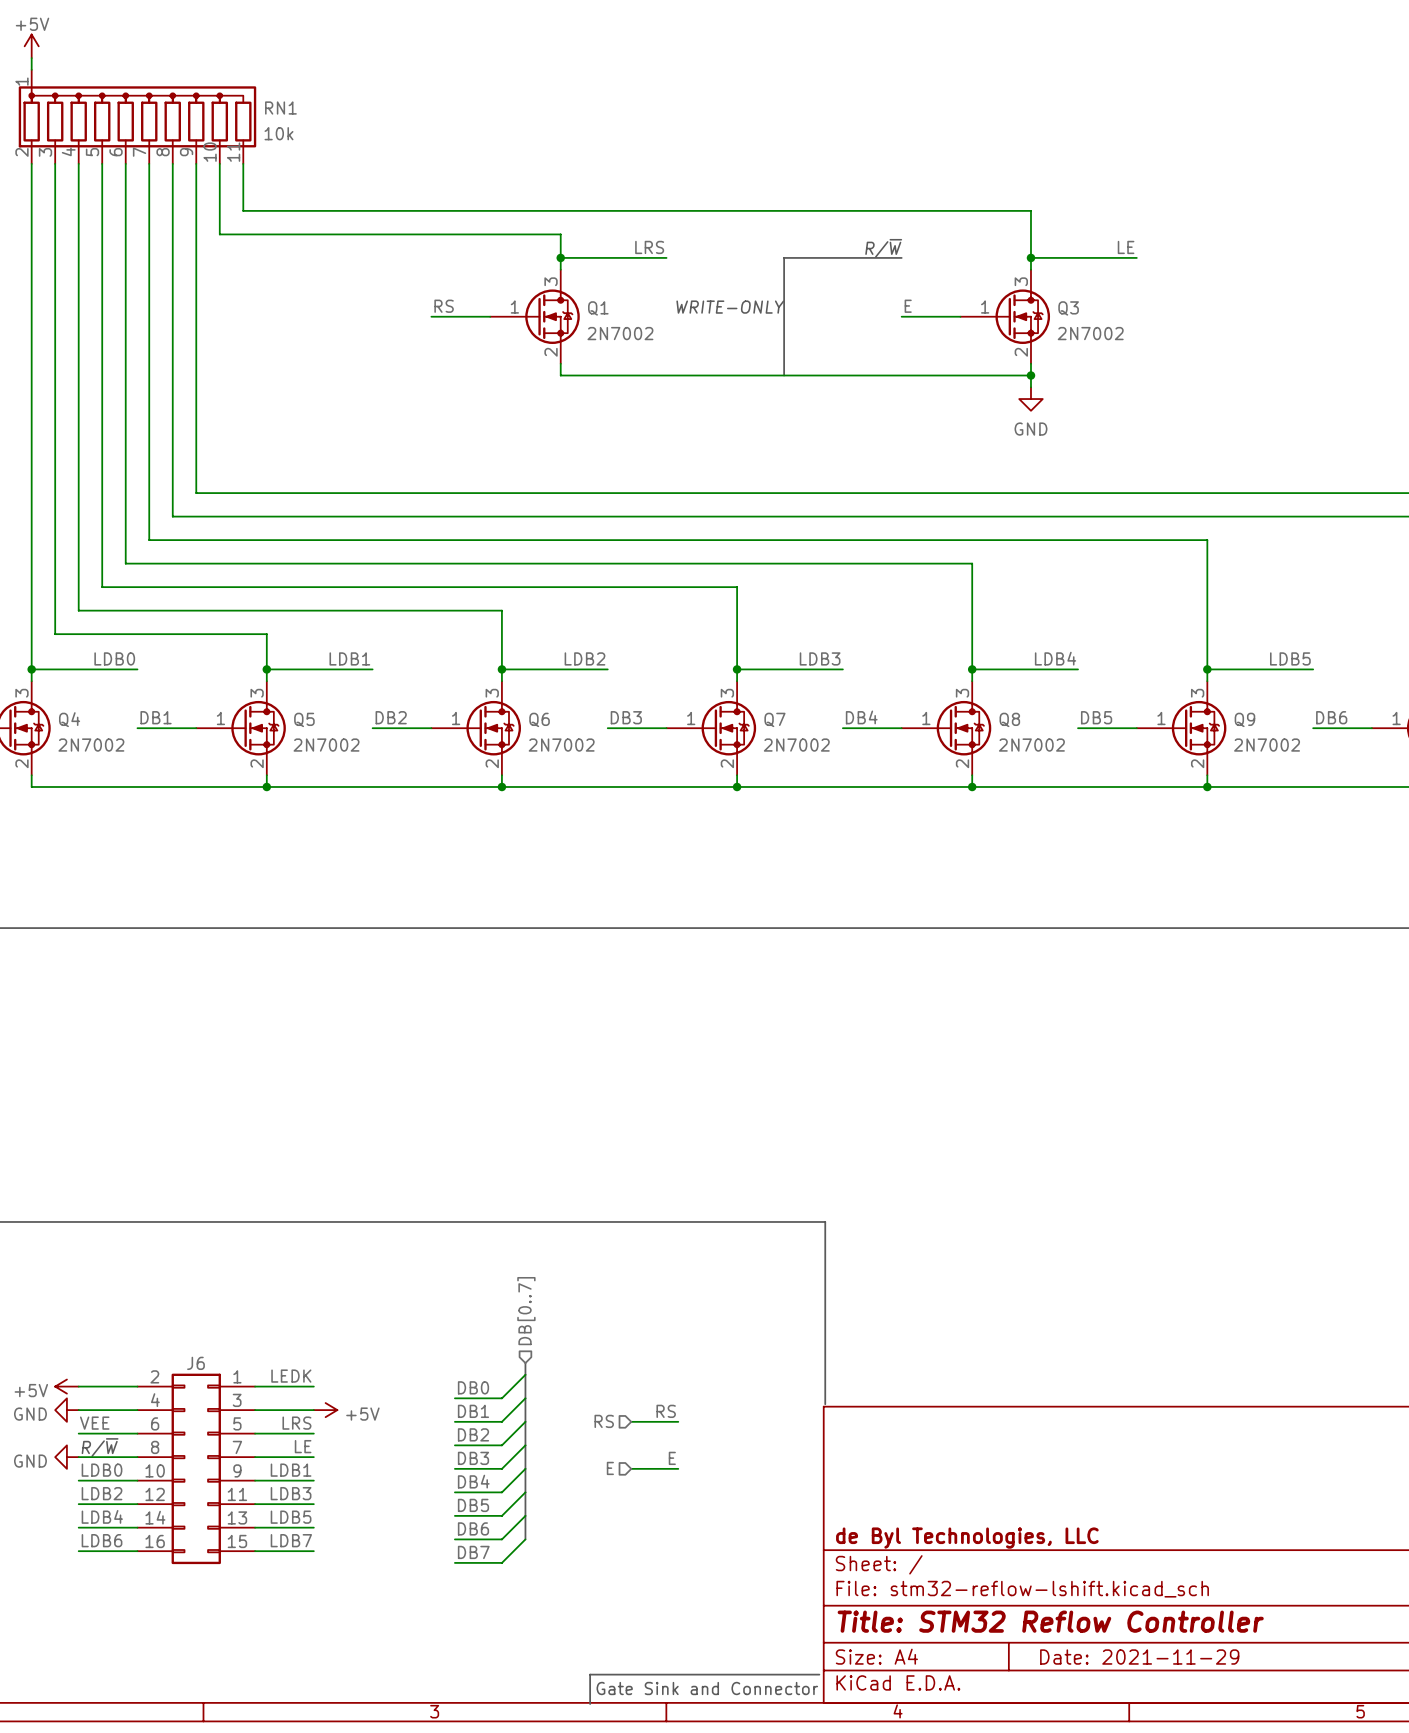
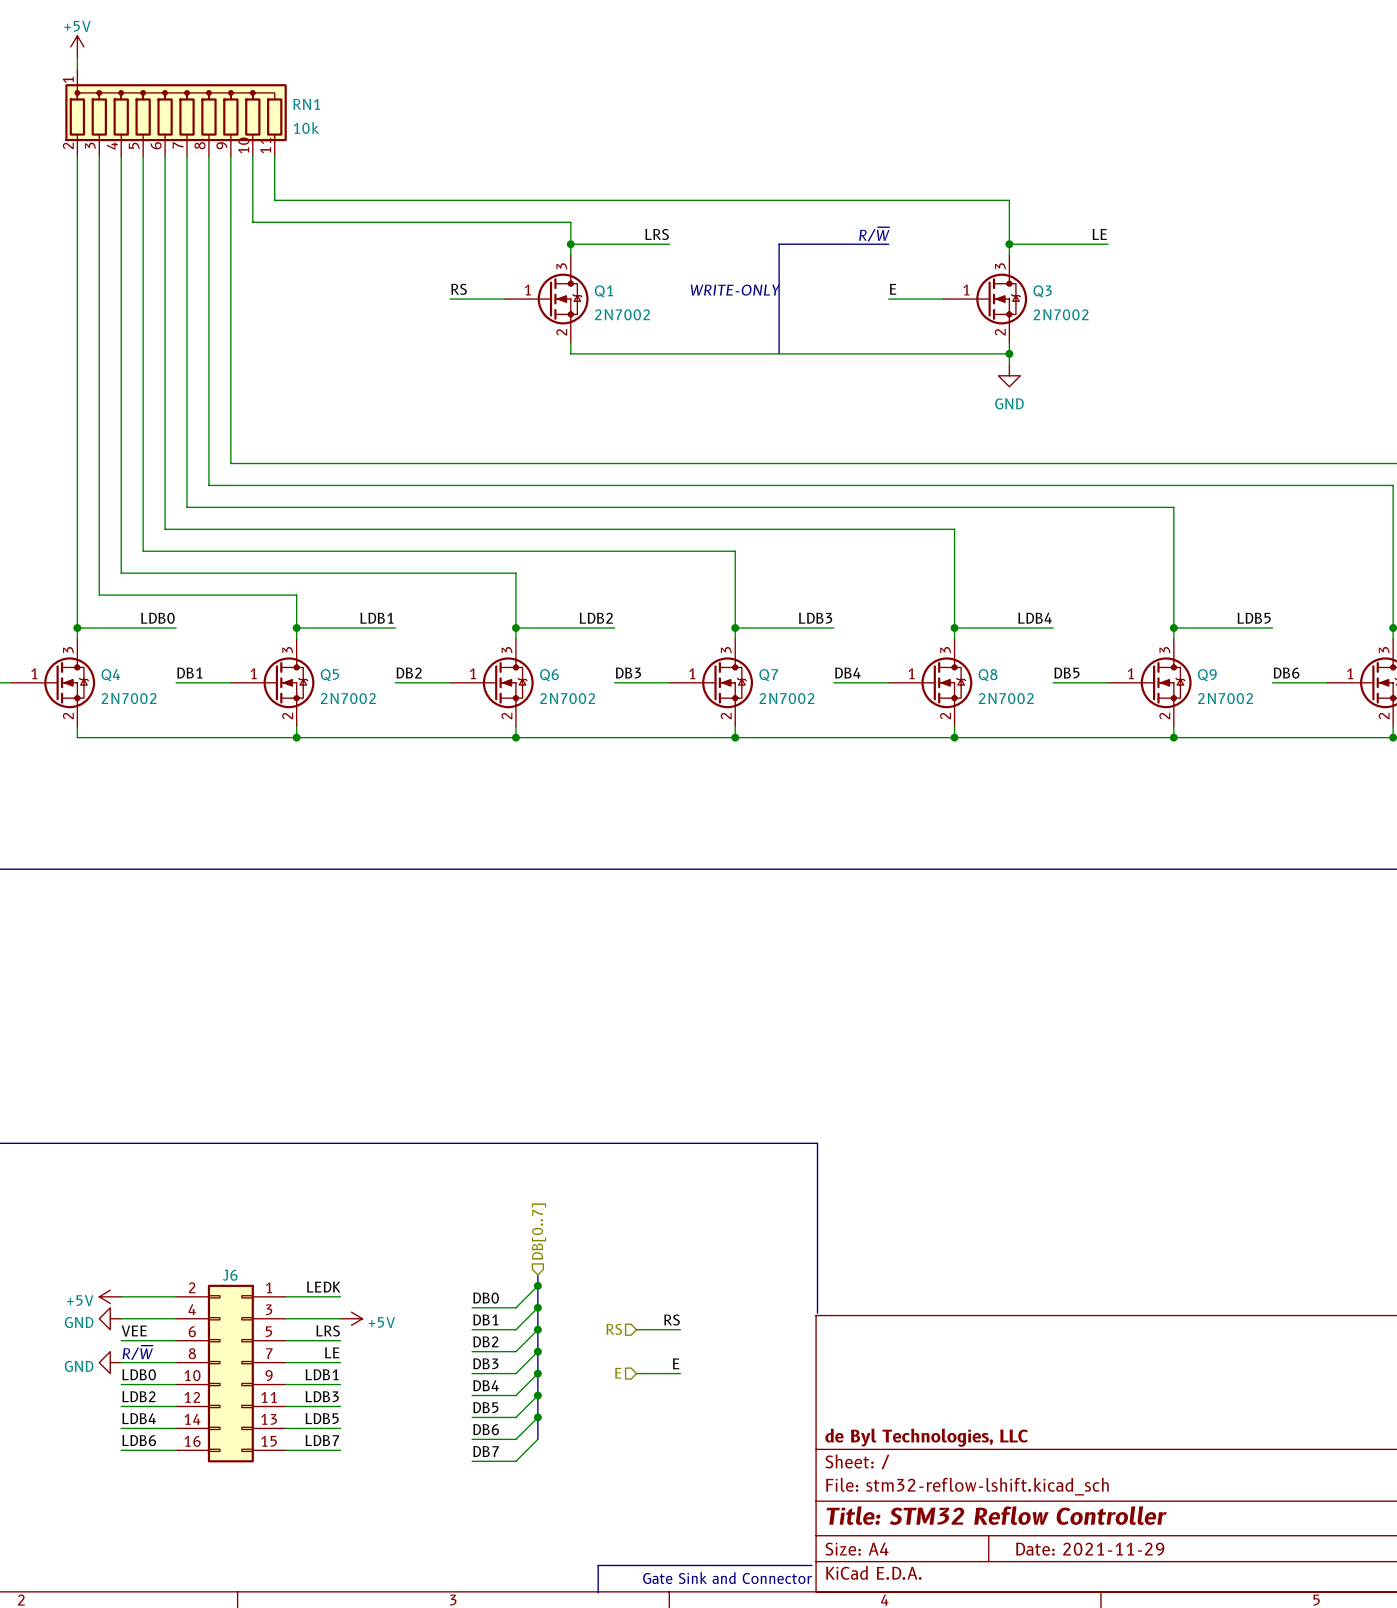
junction: none -> (537, 1285)
junction: none -> (537, 1307)
junction: none -> (537, 1329)
junction: none -> (537, 1351)
junction: none -> (537, 1373)
junction: none -> (537, 1395)
junction: none -> (537, 1417)

